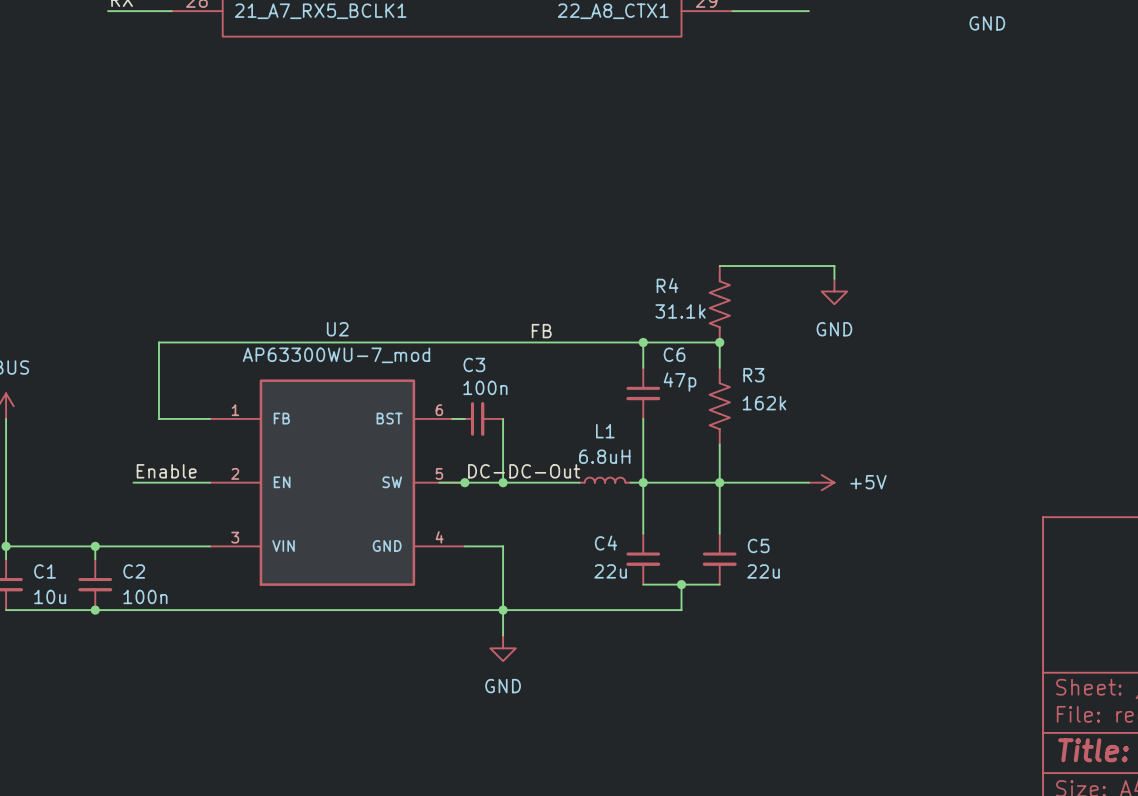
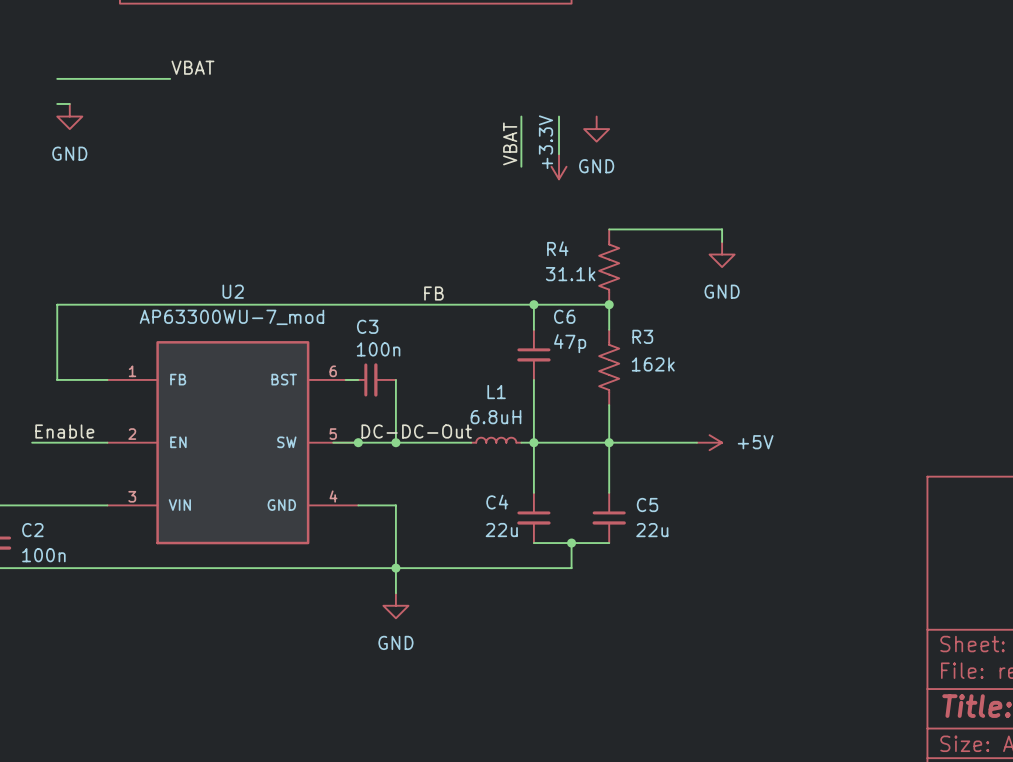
label: none -> VBAT (192, 67)
wire: none -> (57, 78) (170, 78)
wire: none -> (57, 103) (69, 103)
power symbol: none -> GND (69, 116)
wire: none -> (521, 116) (521, 166)
wire: none -> (559, 116) (559, 154)
power symbol: none -> GND (596, 129)
label: none -> VBAT (510, 143)
power symbol: none -> +3.3V (559, 166)

